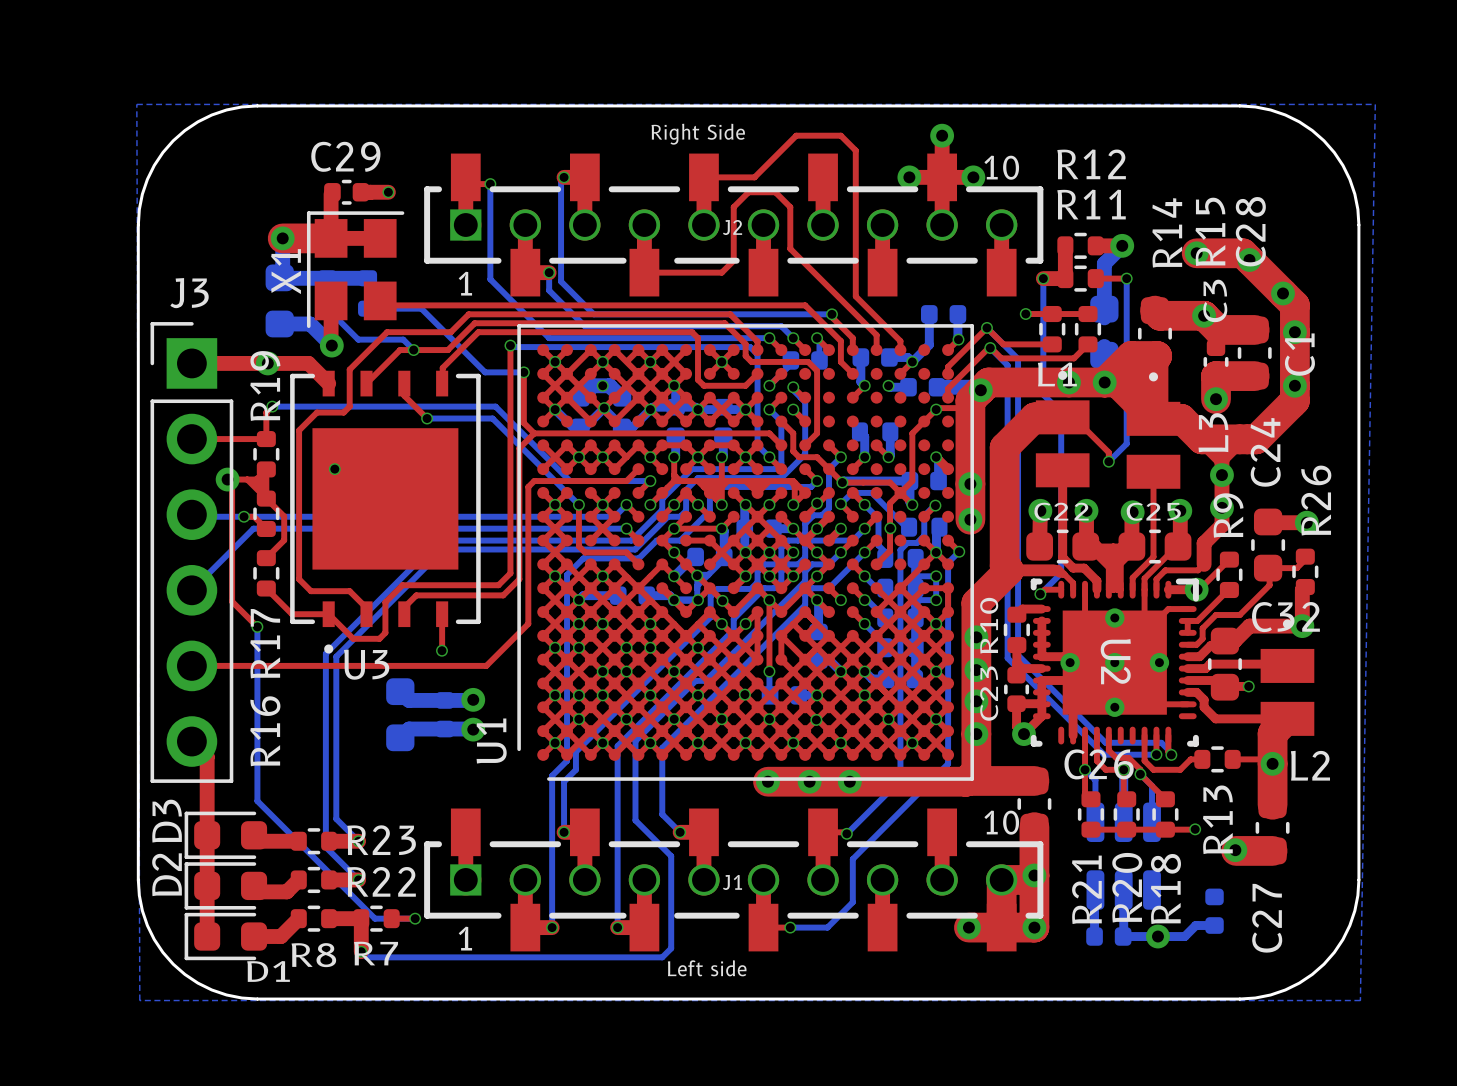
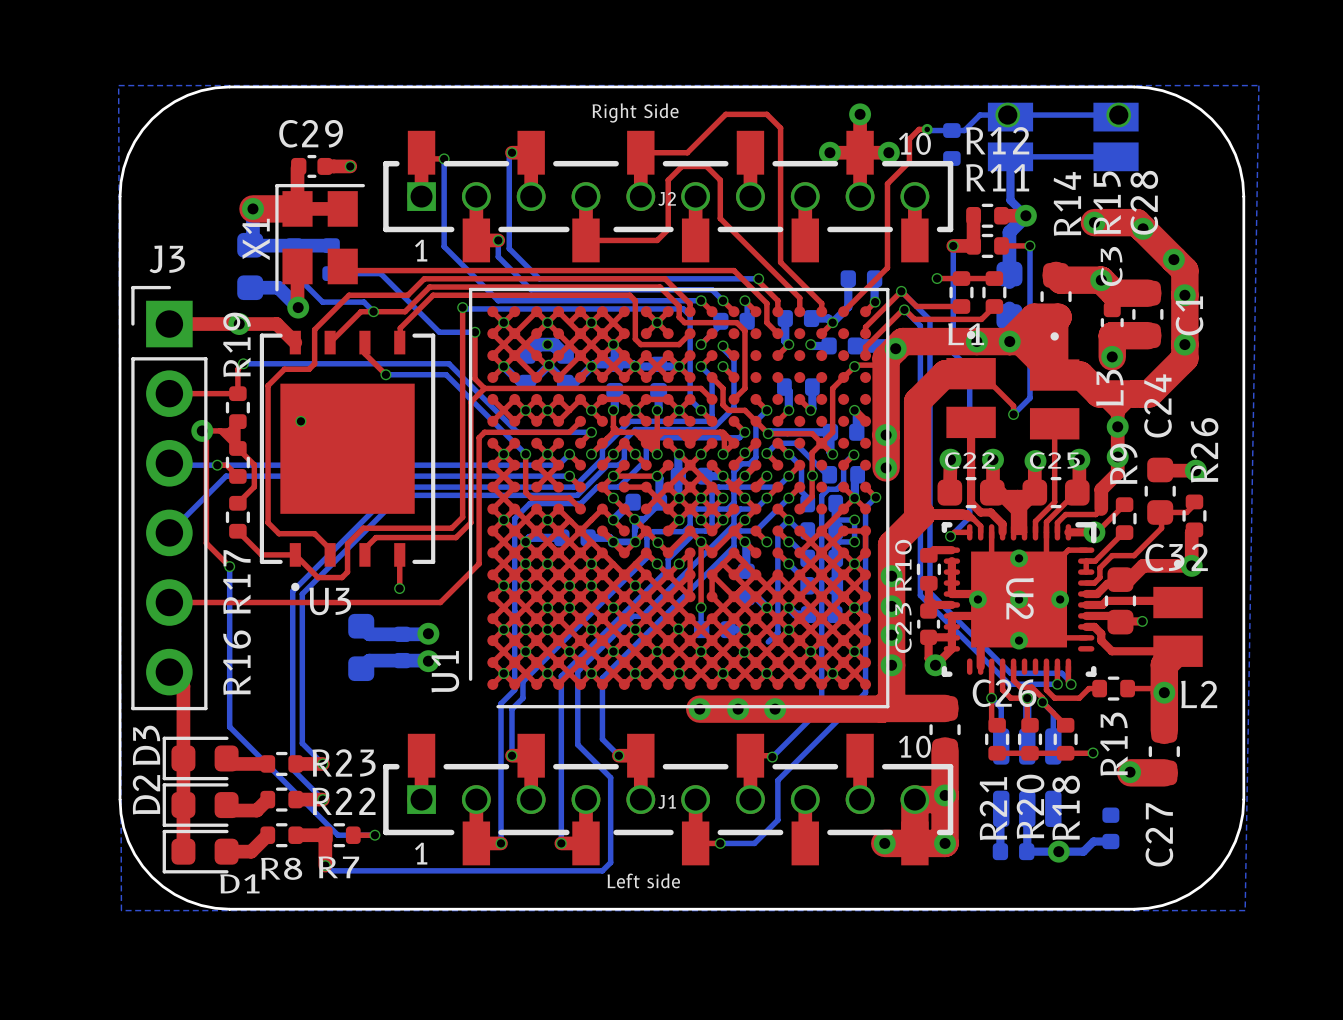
bottom track: none -> (1007, 115) (979, 115) (964, 130) (927, 129)
bottom track: none -> (1118, 115) (1012, 115) (1010, 117)
top track: none -> (927, 129) (919, 129) (909, 139) (909, 161) (887, 183) (887, 267) (843, 311)
via: none -> (927, 129)
part: none -> (1063, 136)
part: none -> (951, 144)
bottom track: none -> (1116, 156) (1010, 156) (1010, 200) (1025, 215)
bottom track: none -> (788, 520) (777, 530) (777, 632) (768, 641)

